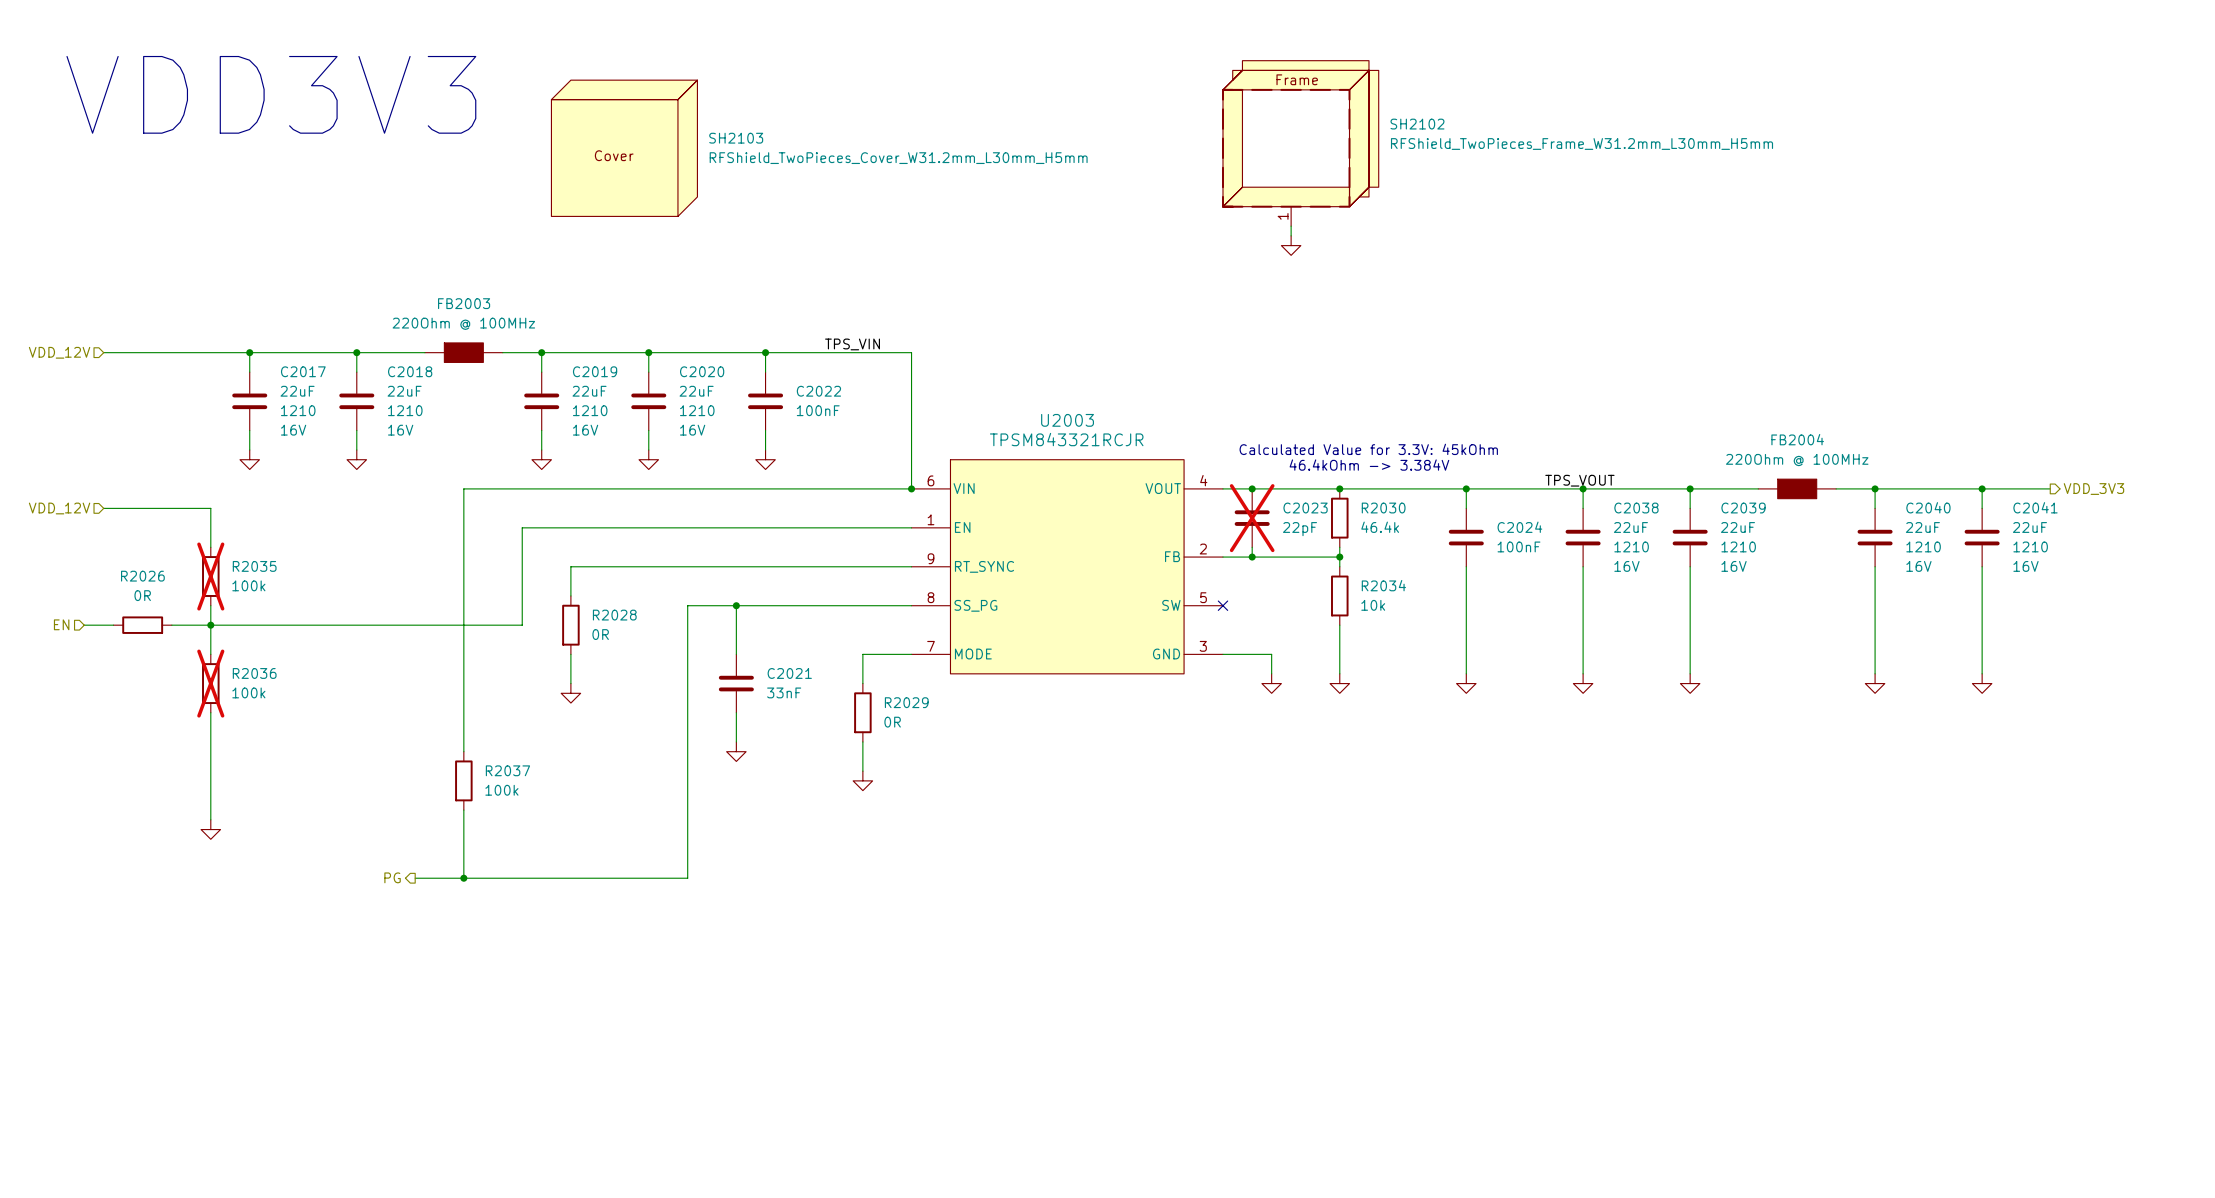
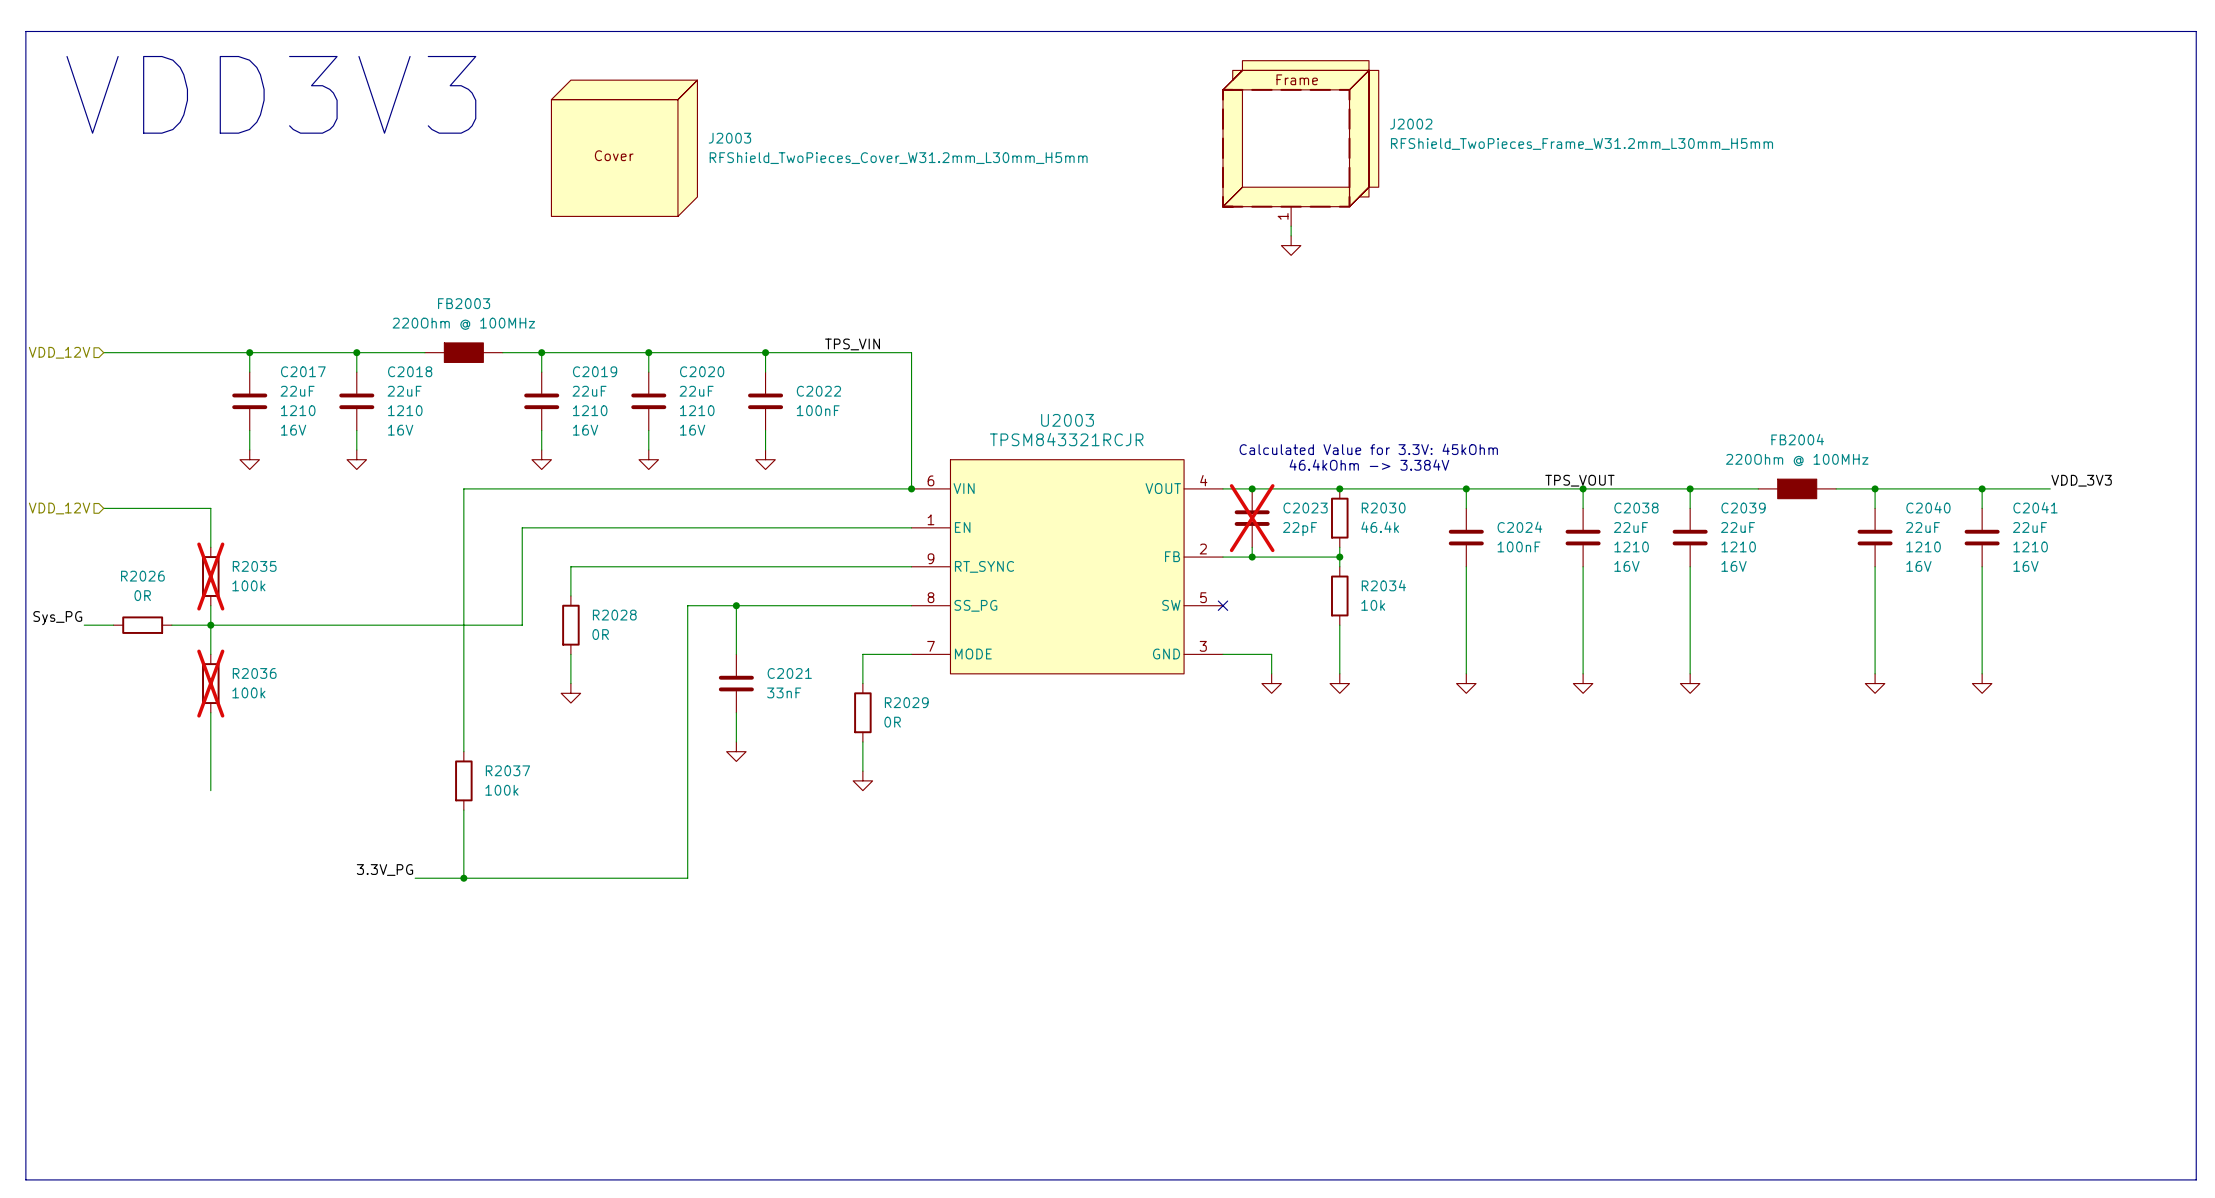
line: none -> (25, 31) (2196, 31) (2196, 1179) (25, 1179) (25, 31)
SH2102 name: SH2102 (1417, 124) -> J2002 (1411, 124)
SH2103 name: SH2103 (736, 138) -> J2003 (729, 138)
label: none -> VDD_3V3 (2081, 480)
hierarchical label: VDD_3V3 (2093, 489) -> none
label: none -> Sys_PG (57, 618)
hierarchical label: EN (61, 624) -> none
wire: (210, 790) (210, 819) -> none
power symbol: (210, 829) -> none
label: none -> 3.3V_PG (384, 870)
hierarchical label: PG (392, 877) -> none

